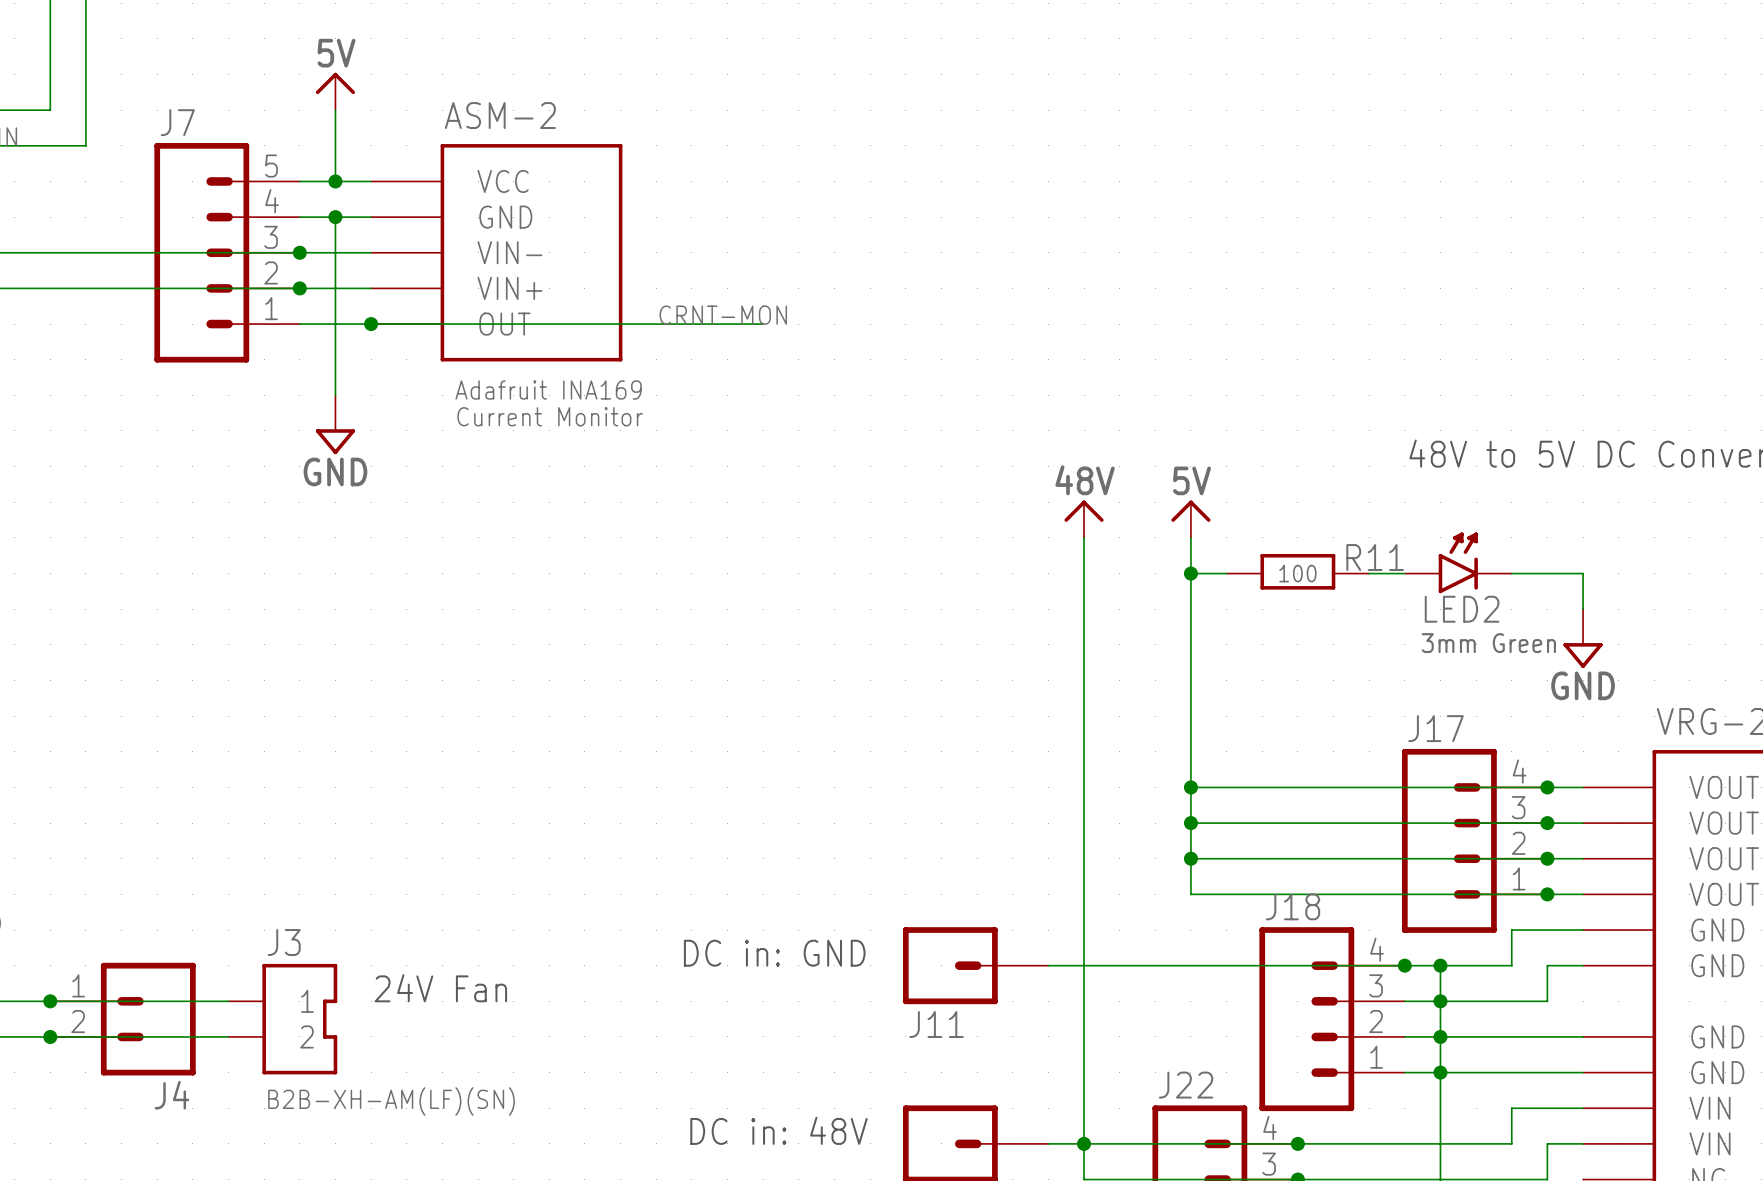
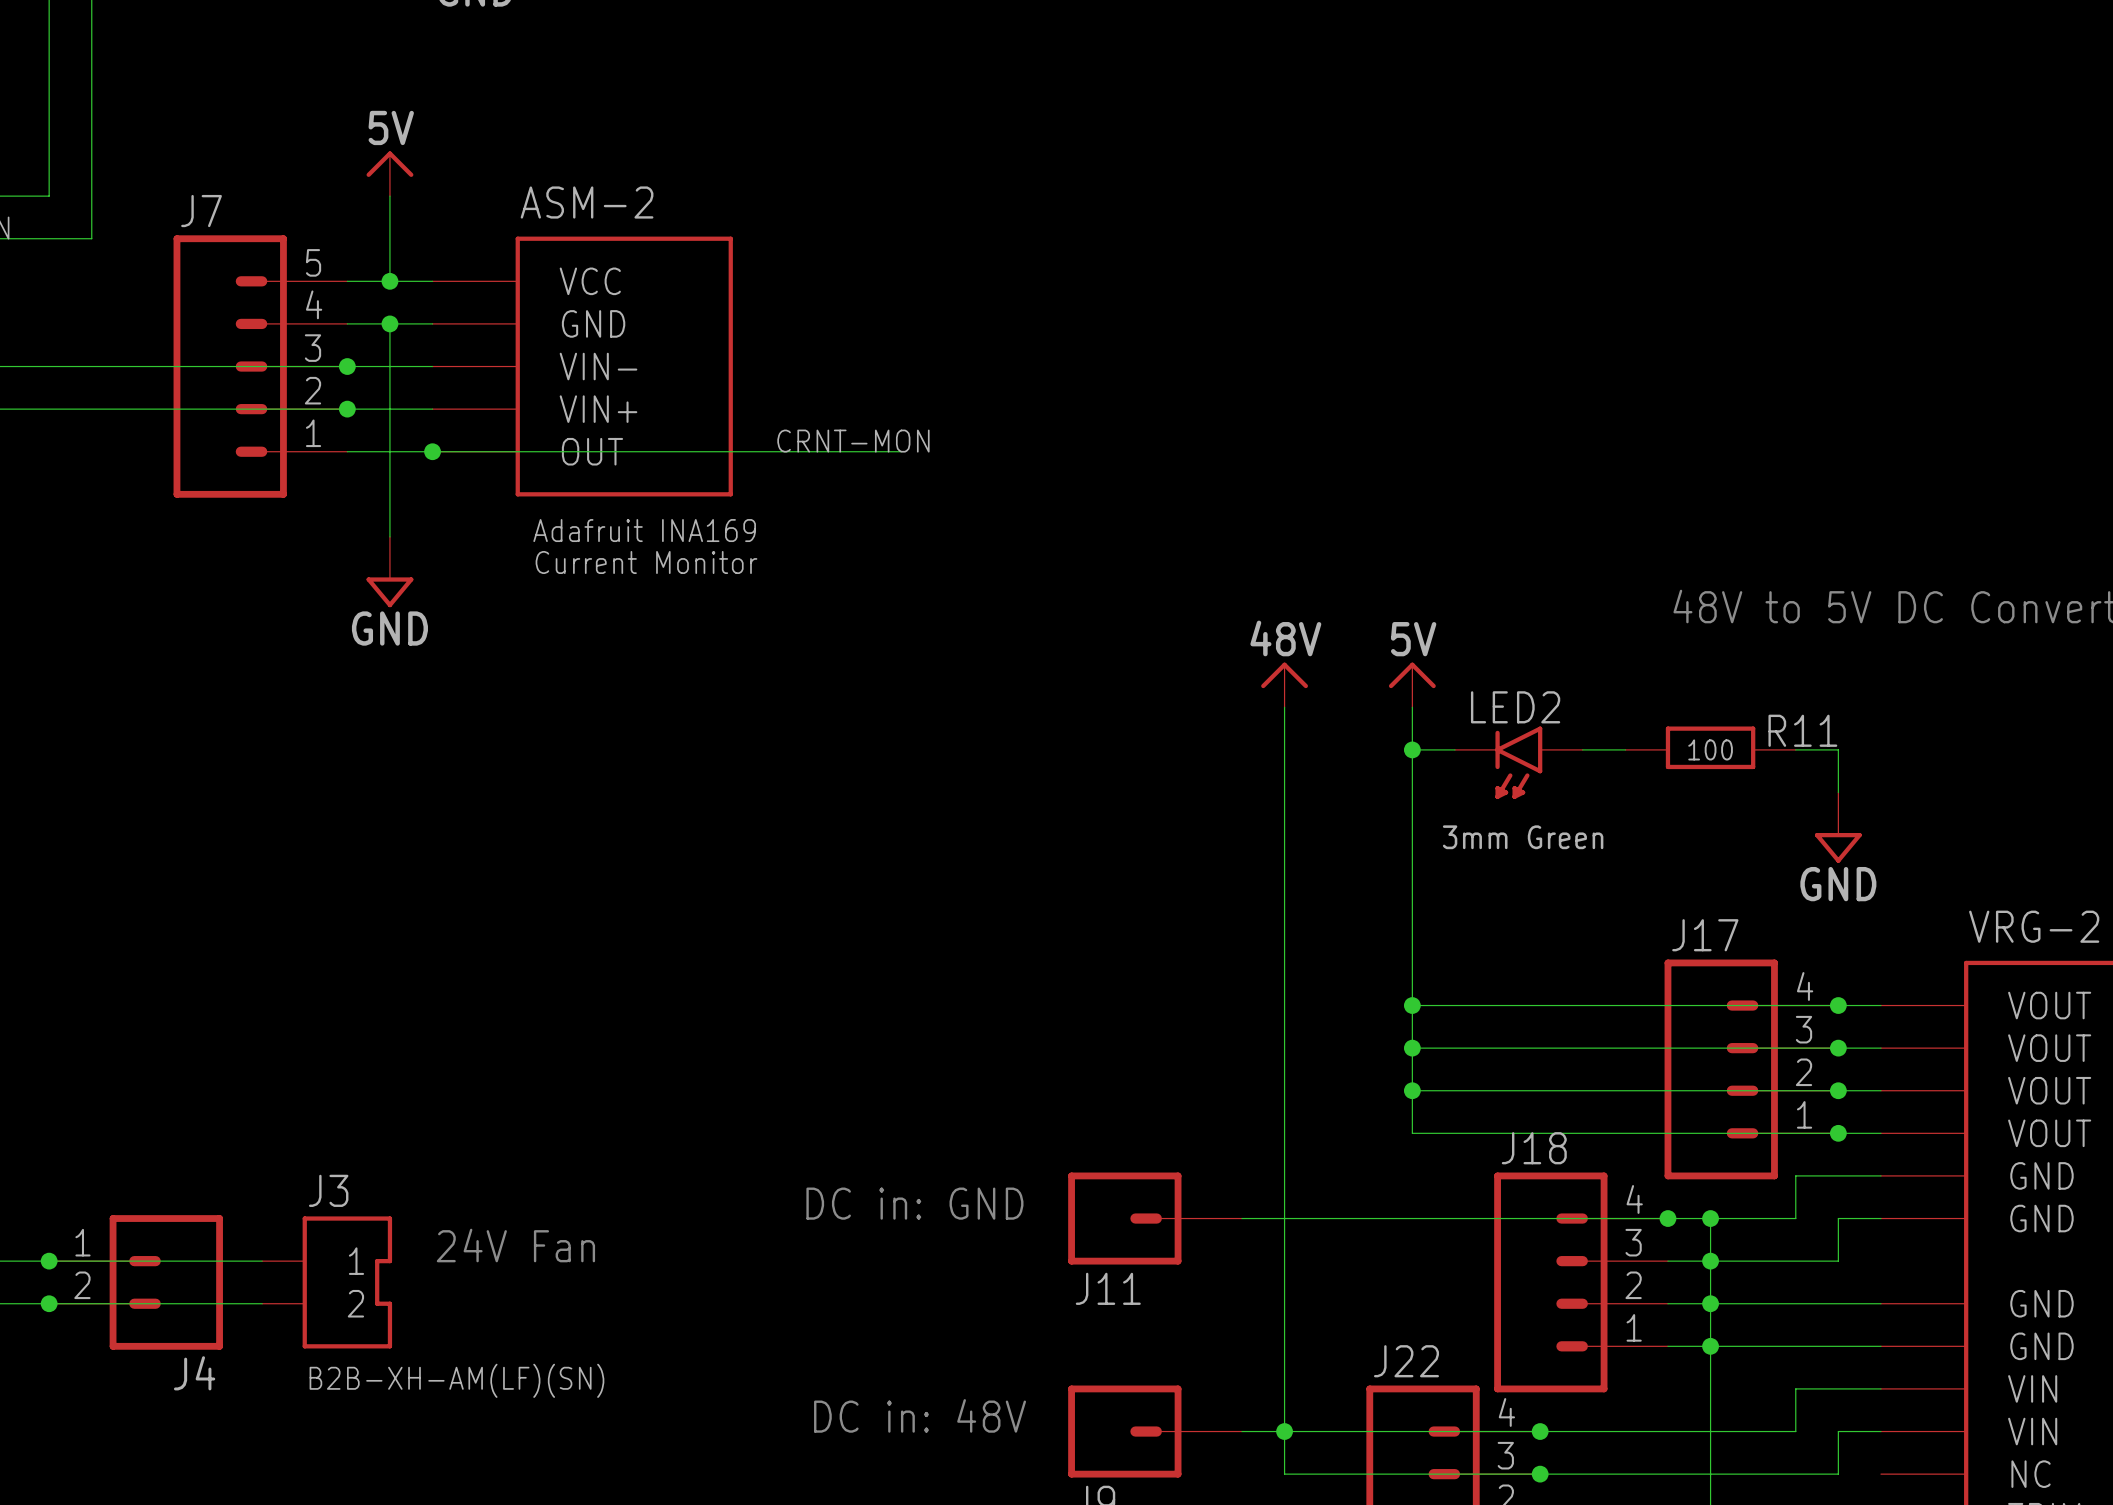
LED2 rotation: 0° (1458, 562) -> 180° (1518, 762)
LED2 position: (1458, 562) -> (1518, 762)
R11 position: (1297, 571) -> (1710, 747)
wire: (1547, 573) (1583, 573) (1583, 609) -> (1838, 749) (1838, 792)
power symbol position: (1583, 638) -> (1838, 827)
LED2 value position: 3mm Green (1488, 643) -> 3mm Green (1523, 837)

